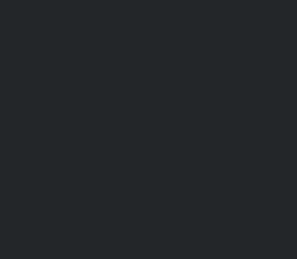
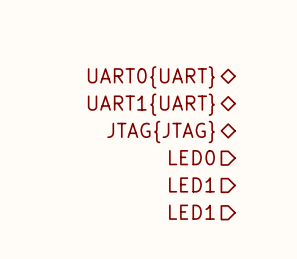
hierarchical label: none -> UART0{UART} (151, 77)
hierarchical label: none -> UART1{UART} (151, 104)
hierarchical label: none -> JTAG{JTAG} (161, 131)
hierarchical label: none -> LED0 (191, 157)
hierarchical label: none -> LED1 (191, 184)
hierarchical label: none -> LED1 (191, 212)

